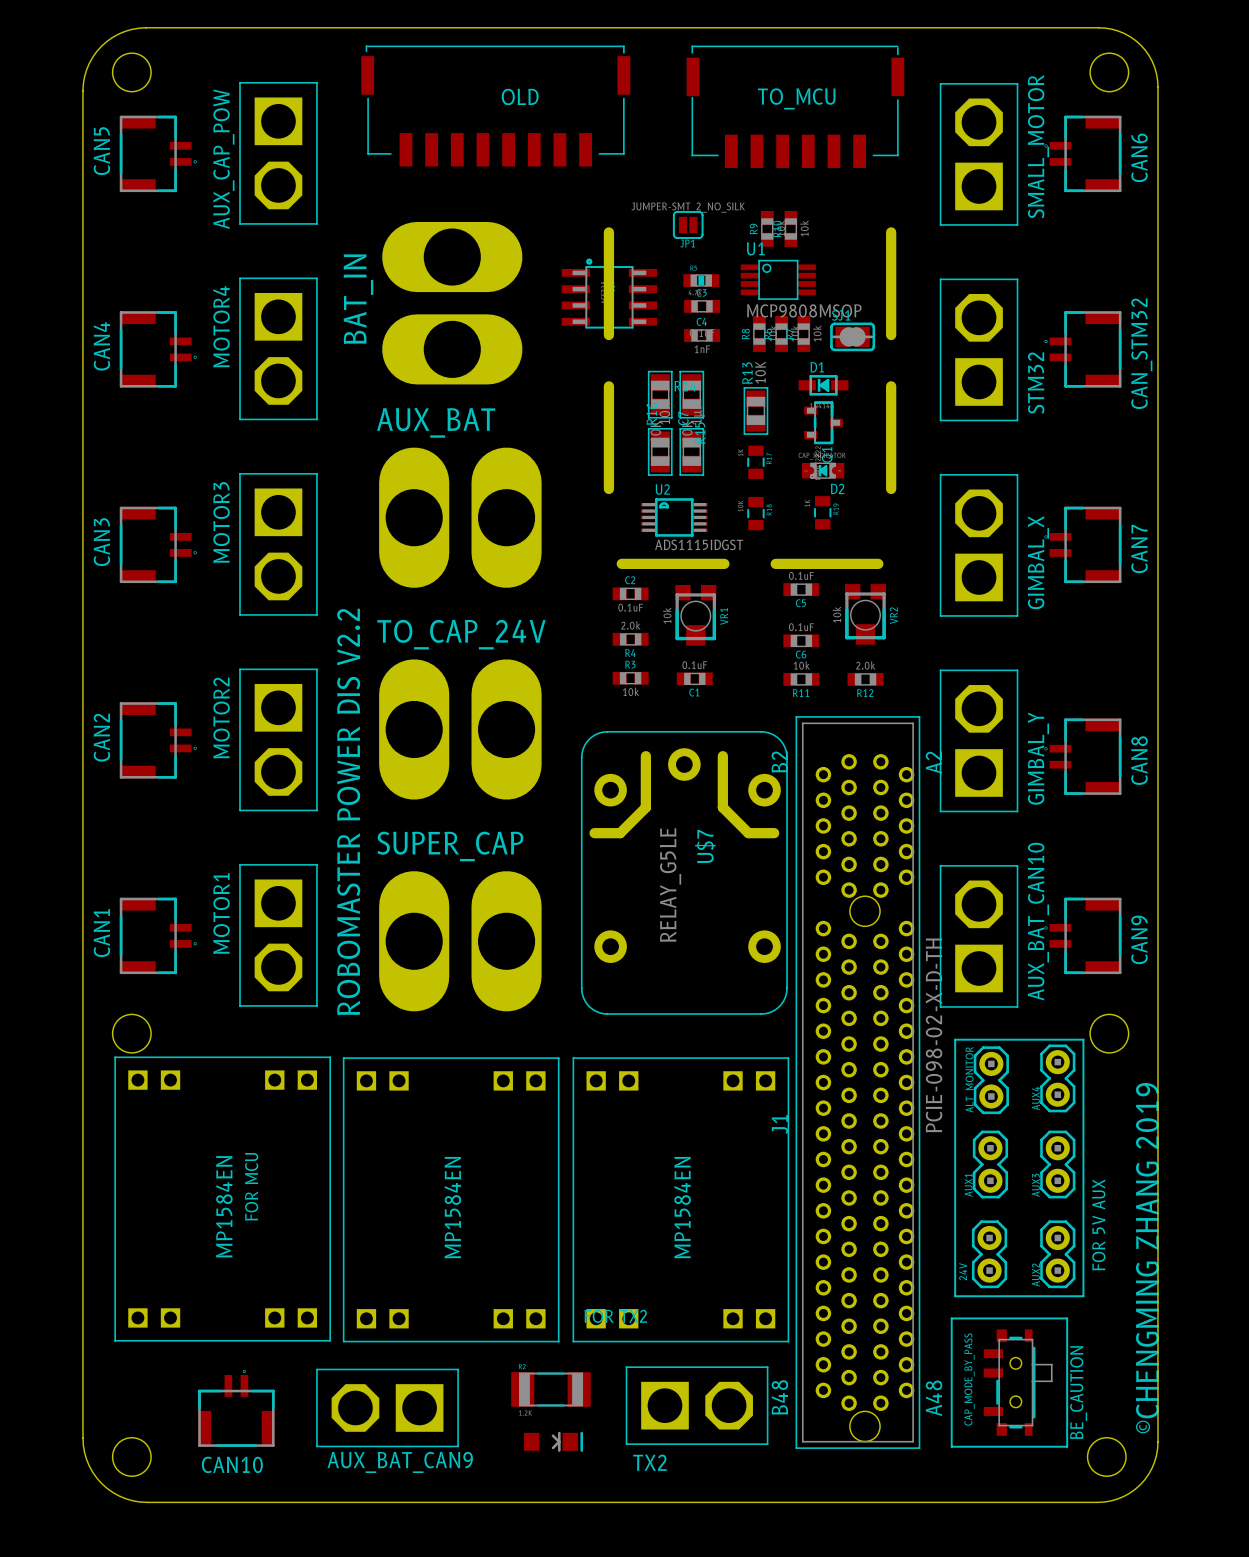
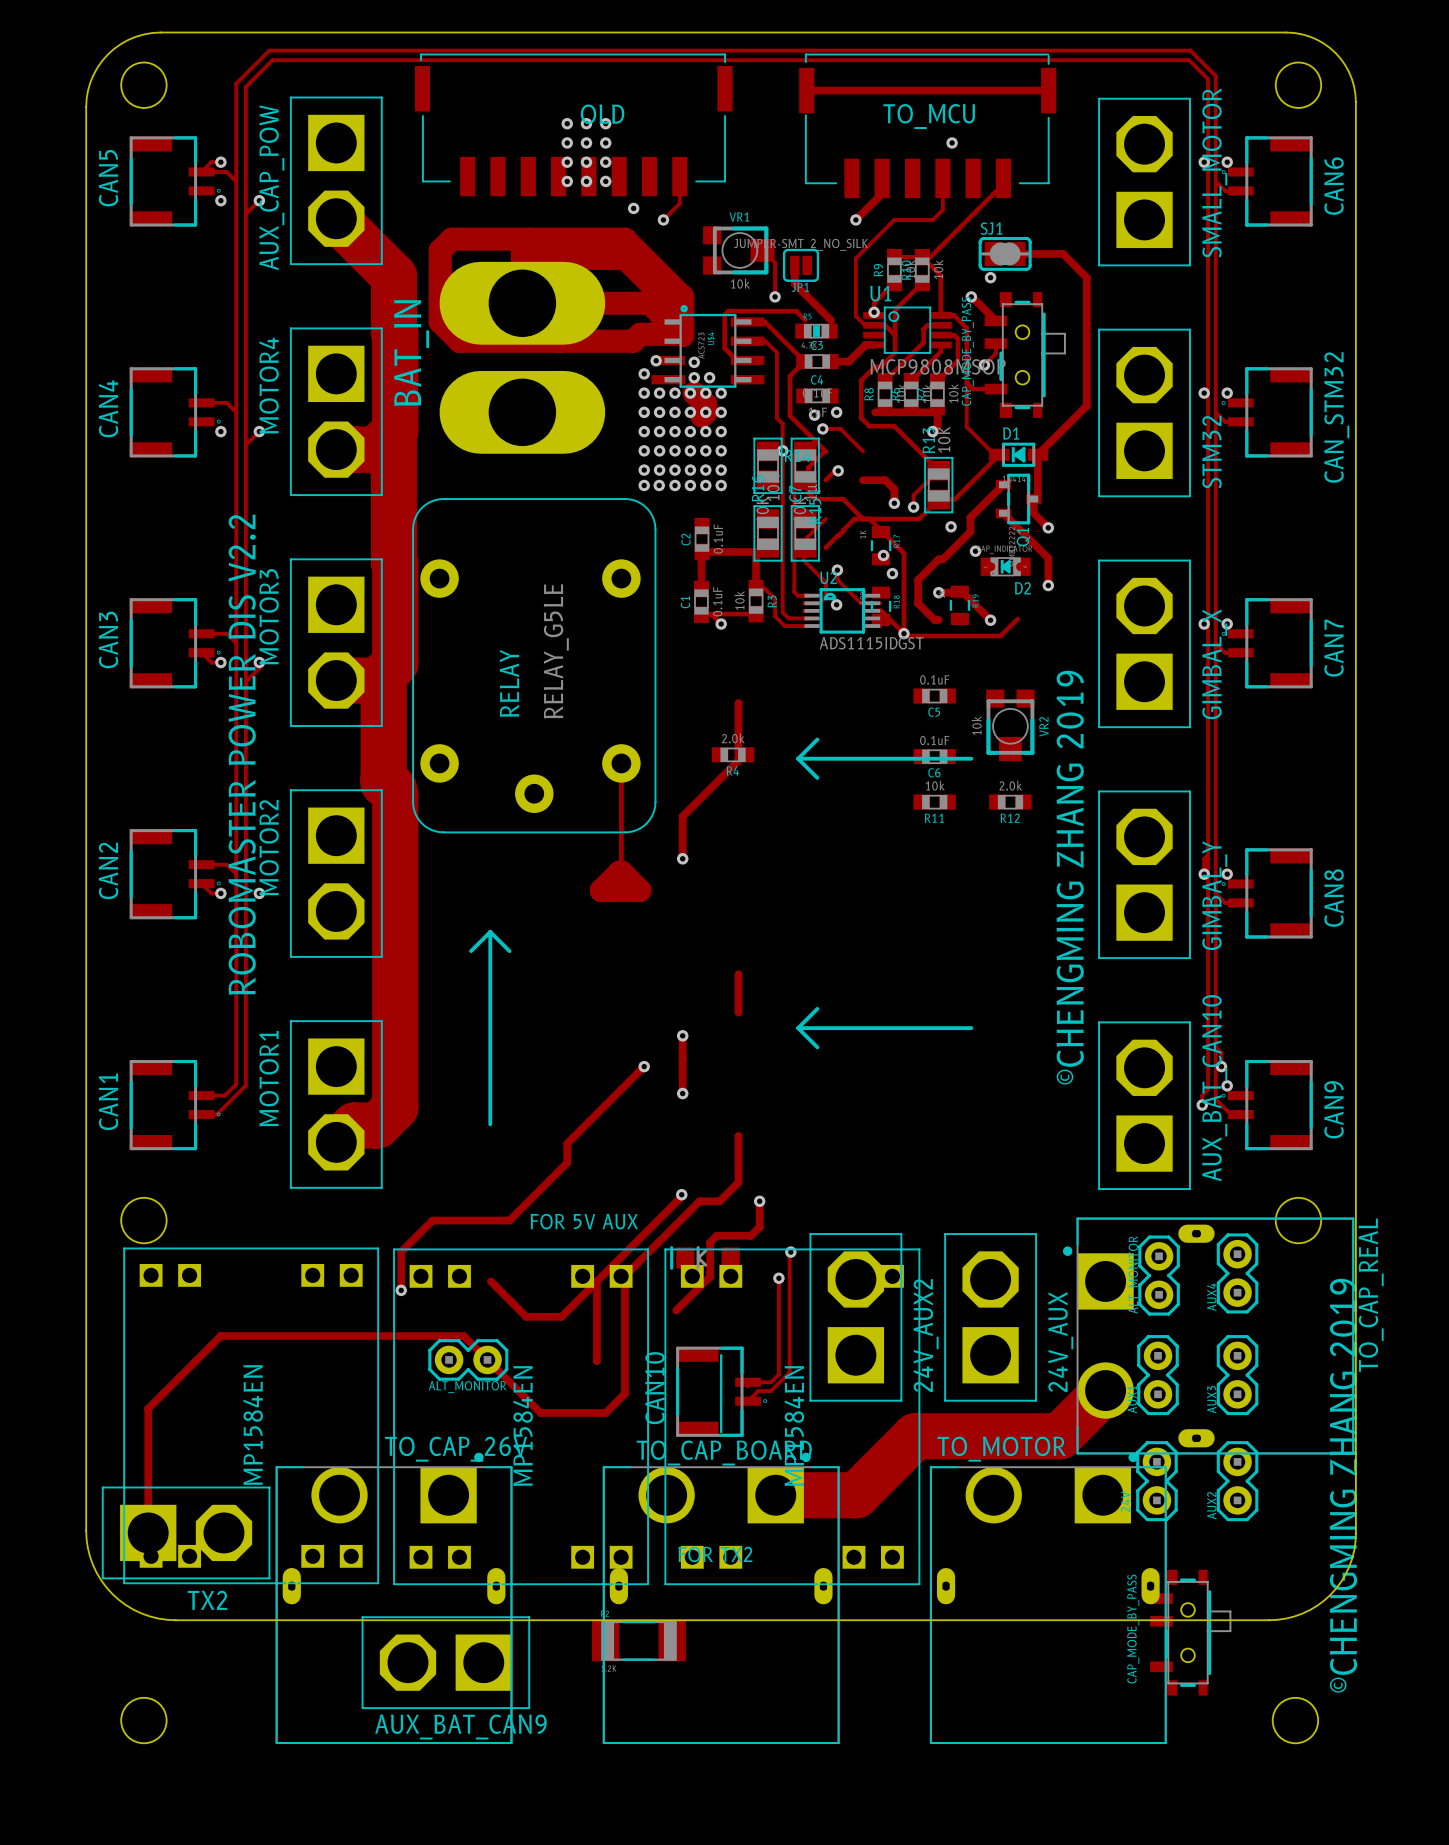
track: none -> (806, 90) (1048, 90)
via: none -> (567, 123)
via: none -> (586, 123)
via: none -> (605, 123)
via: none -> (567, 142)
via: none -> (586, 142)
via: none -> (605, 142)
via: none -> (952, 142)
track: none -> (220, 162) (211, 162) (201, 171) (226, 171) (236, 181)
via: none -> (220, 162)
via: none -> (567, 162)
via: none -> (586, 162)
via: none -> (605, 162)
via: none -> (1204, 162)
via: none -> (1227, 162)
track: none -> (679, 176) (679, 203) (663, 219)
track: none -> (882, 178) (882, 193) (855, 219)
track: none -> (942, 178) (942, 209) (932, 219) (894, 219) (855, 258) (855, 316) (865, 325) (885, 325) (895, 335)
track: none -> (1003, 178) (1003, 184) (930, 257) (894, 257)
AUX_CAP_POW position: (278, 153) -> (336, 180)
via: none -> (567, 181)
via: none -> (586, 181)
via: none -> (605, 181)
track: none -> (1215, 181) (1225, 190) (1240, 190)
via: none -> (220, 200)
track: none -> (259, 200) (245, 214)
via: none -> (259, 200)
via: none -> (633, 208)
track: none -> (336, 218) (394, 276) (395, 332) (395, 430) (374, 450) (336, 449)
via: none -> (663, 219)
via: none -> (855, 219)
track: none -> (762, 250) (775, 262) (775, 296)
track: none -> (1016, 253) (1063, 253) (1086, 277) (1086, 405) (1037, 454) (1037, 494) (1033, 499) (1033, 513) (1048, 527)
track: none -> (922, 257) (940, 275) (940, 315) (954, 315) (966, 328) (966, 382)
track: none -> (794, 265) (794, 284) (831, 320)
board edge: (608, 232) (608, 335) -> none
board edge: (891, 232) (891, 335) -> none
via: none -> (990, 277)
track: none -> (894, 282) (874, 303) (874, 315)
track: none -> (922, 282) (895, 310) (895, 352) (880, 366) (875, 366) (861, 380) (861, 418) (869, 426) (894, 426) (938, 470) (913, 495) (913, 507)
via: none -> (775, 296)
track: none -> (971, 296) (996, 320)
via: none -> (971, 296)
via: none -> (874, 312)
track: none -> (805, 320) (796, 311) (728, 311) (724, 314) (724, 348) (736, 360) (747, 360)
track: none -> (747, 321) (764, 321) (804, 361) (790, 376) (790, 415) (825, 451) (808, 467) (808, 492) (814, 499) (843, 499) (863, 519)
track: none -> (940, 325) (927, 325) (923, 329) (923, 342) (885, 381)
track: none -> (668, 334) (668, 321) (649, 303) (548, 303) (548, 277) (528, 258) (624, 258) (663, 296) (663, 316) (682, 335) (682, 296) (624, 239) (451, 239) (440, 250) (440, 321) (459, 341) (633, 341) (640, 334) (668, 334)
track: none -> (940, 335) (954, 335) (957, 339) (957, 360) (937, 381) (941, 381)
track: none -> (747, 341) (765, 341) (776, 352) (776, 418) (782, 423) (782, 612) (788, 618) (810, 618)
track: none -> (996, 343) (996, 353) (984, 365)
track: none -> (874, 344) (865, 344) (848, 361) (830, 361)
track: none -> (940, 344) (940, 351) (911, 381)
CAP_MODE_BY_PASS: none -> (1025, 354)
via: none -> (656, 360)
via: none -> (694, 362)
via: none -> (984, 365)
via: none -> (644, 373)
via: none -> (694, 377)
via: none -> (709, 377)
track: none -> (966, 382) (966, 427) (996, 457)
track: none -> (966, 382) (972, 389) (996, 389) (993, 391)
via: none -> (644, 393)
via: none -> (659, 393)
via: none -> (675, 393)
via: none -> (690, 393)
track: none -> (694, 393) (705, 404) (705, 412) (701, 416)
via: none -> (705, 393)
via: none -> (721, 393)
via: none -> (1204, 393)
via: none -> (1227, 393)
SJ1 position: (852, 336) -> (1005, 253)
track: none -> (201, 402) (226, 402) (236, 412)
MOTOR4 position: (278, 348) -> (336, 411)
via: none -> (644, 412)
via: none -> (659, 412)
via: none -> (675, 412)
via: none -> (690, 412)
via: none -> (705, 412)
via: none -> (721, 412)
via: none -> (836, 412)
track: none -> (875, 412) (932, 412) (937, 407) (937, 426) (932, 431)
track: none -> (1215, 412) (1225, 421) (1240, 421)
via: none -> (814, 415)
track: none -> (822, 428) (840, 428) (863, 451)
via: none -> (822, 428)
via: none -> (220, 431)
track: none -> (259, 431) (245, 445)
via: none -> (259, 431)
track: none -> (394, 431) (395, 663) (378, 680) (336, 680)
via: none -> (644, 431)
via: none -> (659, 431)
via: none -> (675, 431)
via: none -> (690, 431)
via: none -> (705, 431)
via: none -> (721, 431)
via: none -> (932, 431)
via: none -> (644, 450)
via: none -> (659, 450)
via: none -> (675, 450)
via: none -> (690, 450)
via: none -> (705, 450)
via: none -> (721, 450)
via: none -> (782, 450)
track: none -> (798, 450) (794, 454) (794, 592) (797, 595) (810, 595)
D1 position: (823, 385) -> (1018, 454)
track: none -> (999, 454) (954, 499) (938, 499) (919, 519) (854, 519) (825, 547)
board edge: (608, 386) (608, 488) -> none
board edge: (891, 386) (891, 488) -> none
via: none -> (644, 470)
via: none -> (659, 470)
via: none -> (675, 470)
via: none -> (690, 470)
via: none -> (705, 470)
via: none -> (721, 470)
track: none -> (838, 470) (835, 470) (825, 480)
via: none -> (838, 470)
track: none -> (863, 480) (885, 480) (894, 489) (894, 503)
R13 position: (755, 410) -> (938, 485)
track: none -> (1003, 484) (970, 517) (970, 531) (942, 559) (938, 559) (918, 579) (918, 603) (934, 619) (938, 619)
via: none -> (644, 485)
via: none -> (659, 485)
via: none -> (675, 485)
via: none -> (690, 485)
via: none -> (705, 485)
via: none -> (721, 485)
Q1 position: (823, 422) -> (1018, 499)
via: none -> (894, 503)
via: none -> (913, 507)
track: none -> (1003, 513) (1048, 558) (1048, 585)
track: none -> (825, 519) (803, 541) (803, 560) (825, 584) (825, 597) (820, 603) (810, 603)
track: none -> (869, 519) (903, 553) (903, 633)
via: none -> (951, 526)
via: none -> (1048, 527)
via: none -> (975, 551)
via: none -> (883, 555)
D2 position: (823, 470) -> (1005, 566)
track: none -> (837, 570) (837, 579) (860, 603) (874, 603)
via: none -> (837, 570)
via: none -> (892, 573)
via: none -> (1048, 585)
track: none -> (701, 589) (702, 551) (755, 551) (756, 588) (764, 588) (775, 599) (775, 616) (784, 626) (810, 626)
track: none -> (938, 592) (962, 592) (990, 620)
via: none -> (938, 592)
via: none -> (836, 604)
AUX_BAT: (460, 517) -> none
U2 position: (674, 517) -> (842, 610)
track: none -> (874, 610) (881, 610) (906, 636) (1000, 636) (1017, 618)
track: none -> (756, 614) (701, 614) (711, 614) (721, 624)
via: none -> (990, 620)
via: none -> (721, 624)
via: none -> (1204, 624)
via: none -> (1227, 624)
track: none -> (201, 633) (226, 633) (236, 643)
via: none -> (903, 633)
MOTOR3 position: (278, 544) -> (336, 642)
track: none -> (1215, 643) (1225, 652) (1240, 652)
track: none -> (201, 652) (211, 662) (220, 662)
via: none -> (220, 662)
track: none -> (259, 662) (259, 668) (245, 681)
via: none -> (259, 662)
RELAY: none -> RELAY_G5LE (534, 665)
board edge: (621, 563) (724, 563) -> none
board edge: (775, 563) (878, 563) -> none
track: none -> (383, 674) (383, 783) (395, 794) (395, 1107) (377, 1125) (354, 1125) (336, 1142)
C2 rotation: 0° (630, 593) -> 90° clockwise (702, 539)
C2 position: (630, 593) -> (702, 539)
track: none -> (738, 702) (738, 760) (682, 816) (682, 858)
VR1 rotation: 0° (695, 615) -> 90° counterclockwise (738, 250)
VR1 position: (695, 615) -> (738, 250)
line: none -> (817, 739) (798, 758)
line: none -> (798, 758) (971, 758)
line: none -> (798, 758) (817, 777)
track: none -> (621, 763) (621, 872)
R3 rotation: 0° (630, 678) -> 90° clockwise (756, 601)
R3 position: (630, 678) -> (756, 601)
C1 rotation: 0° (694, 678) -> 90° clockwise (701, 601)
C1 position: (694, 678) -> (701, 601)
track: none -> (1208, 854) (1204, 858) (1204, 874)
via: none -> (682, 858)
TO_CAP_24V: (460, 729) -> none
track: none -> (201, 864) (226, 864) (236, 874)
track: none -> (621, 872) (639, 890) (601, 890) (619, 872) (621, 872)
MOTOR2 position: (278, 739) -> (336, 873)
via: none -> (1204, 874)
via: none -> (1227, 874)
text: none -> ©CHENGMING ZHANG 2019 (1070, 877)
track: none -> (201, 883) (211, 893) (220, 893)
via: none -> (220, 893)
via: none -> (259, 893)
board edge: (645, 756) (645, 807) (620, 833) (594, 833) -> none
board edge: (722, 756) (722, 807) (748, 833) (774, 833) -> none
track: none -> (1215, 893) (1225, 902) (1240, 902)
line: none -> (490, 931) (490, 1124)
line: none -> (490, 931) (471, 951)
line: none -> (490, 931) (509, 951)
text position: ROBOMASTER POWER DIS V2.2 (348, 812) -> ROBOMASTER POWER DIS V2.2 (242, 754)
track: none -> (738, 974) (738, 1012)
line: none -> (817, 1008) (798, 1028)
line: none -> (798, 1028) (971, 1028)
line: none -> (798, 1028) (817, 1047)
U$7: RELAY_G5LE (684, 872) -> none
track: none -> (682, 1035) (682, 1093)
via: none -> (682, 1035)
track: none -> (1215, 1047) (1221, 1053) (1221, 1066)
track: none -> (644, 1066) (567, 1143) (567, 1162) (509, 1220) (432, 1220) (401, 1251) (401, 1290)
via: none -> (644, 1066)
via: none -> (1221, 1066)
via: none -> (1227, 1085)
via: none -> (682, 1093)
track: none -> (201, 1095) (224, 1095) (236, 1084) (236, 83) (269, 50) (1190, 50) (1215, 75) (1215, 1099) (1230, 1114) (1240, 1114)
MOTOR1 position: (278, 935) -> (336, 1104)
track: none -> (1202, 1105) (1202, 1095) (1208, 1089) (1208, 79) (1189, 60) (272, 60) (245, 86) (245, 1085) (216, 1114) (201, 1114)
via: none -> (1202, 1105)
SUPER_CAP: (460, 941) -> none
track: none -> (738, 1135) (738, 1182) (719, 1201) (699, 1201) (624, 1275) (624, 1393) (605, 1412) (540, 1412) (463, 1336) (220, 1336) (148, 1408) (148, 1532)
via: none -> (681, 1194)
track: none -> (682, 1195) (561, 1316) (526, 1316) (490, 1281)
track: none -> (759, 1201) (759, 1227) (750, 1235) (716, 1235) (710, 1242) (710, 1276) (676, 1310)
via: none -> (759, 1201)
text: none -> FOR 5V AUX (584, 1221)
line: (955, 1039) (1083, 1039) (1083, 1296) (955, 1296) (955, 1039) -> none
track: none -> (790, 1252) (789, 1372) (771, 1391) (758, 1391) (748, 1401)
via: none -> (790, 1252)
part: none -> (704, 1257)
track: none -> (778, 1278) (778, 1374) (771, 1382) (748, 1382) (747, 1386)
via: none -> (778, 1278)
J1: PCIE-098-02-X-D-TH (857, 1082) -> none
track: none -> (596, 1281) (596, 1361)
via: none -> (401, 1290)
24V_AUX2: none -> (855, 1317)
24V_AUX: none -> (990, 1317)
TO_CAP_REAL: none -> (1208, 1336)
line: none -> (721, 1355) (721, 1432)
ALT_MONITOR: none -> (468, 1359)
track: none -> (1105, 1390) (1059, 1436) (915, 1436) (856, 1495) (775, 1495)
text: FOR MCU (251, 1186) -> none
text: FOR 5V AUX (1098, 1224) -> none
board edge: (82, 1296) (82, 1438) (86, 1459) (96, 1478) (107, 1488) (125, 1498) (147, 1502) (1111, 1500) (1129, 1493) (1140, 1484) (1148, 1474) (1156, 1455) (1157, 1298) -> (86, 1530) (87, 1548) (93, 1564) (101, 1580) (112, 1594) (125, 1605) (141, 1613) (158, 1618) (175, 1620) (1277, 1619) (1294, 1616) (1310, 1610) (1324, 1600) (1336, 1588) (1345, 1574) (1352, 1558) (1355, 1533)
line: (951, 1318) (1067, 1318) (1067, 1446) (951, 1446) (951, 1318) -> none
TO_CAP_26V: none -> (394, 1598)
TO_CAP_BOARD: none -> (721, 1598)
TO_MOTOR: none -> (1048, 1598)
text: BE_CAUTION (1078, 1392) -> none
TX2 position: (697, 1405) -> (186, 1532)
CAN10 rotation: 0° (236, 1408) -> 90° clockwise (721, 1391)
CAN10 position: (236, 1408) -> (721, 1391)
part: (553, 1441) -> none
TX2 name position: TX2 (649, 1462) -> TX2 (207, 1600)

